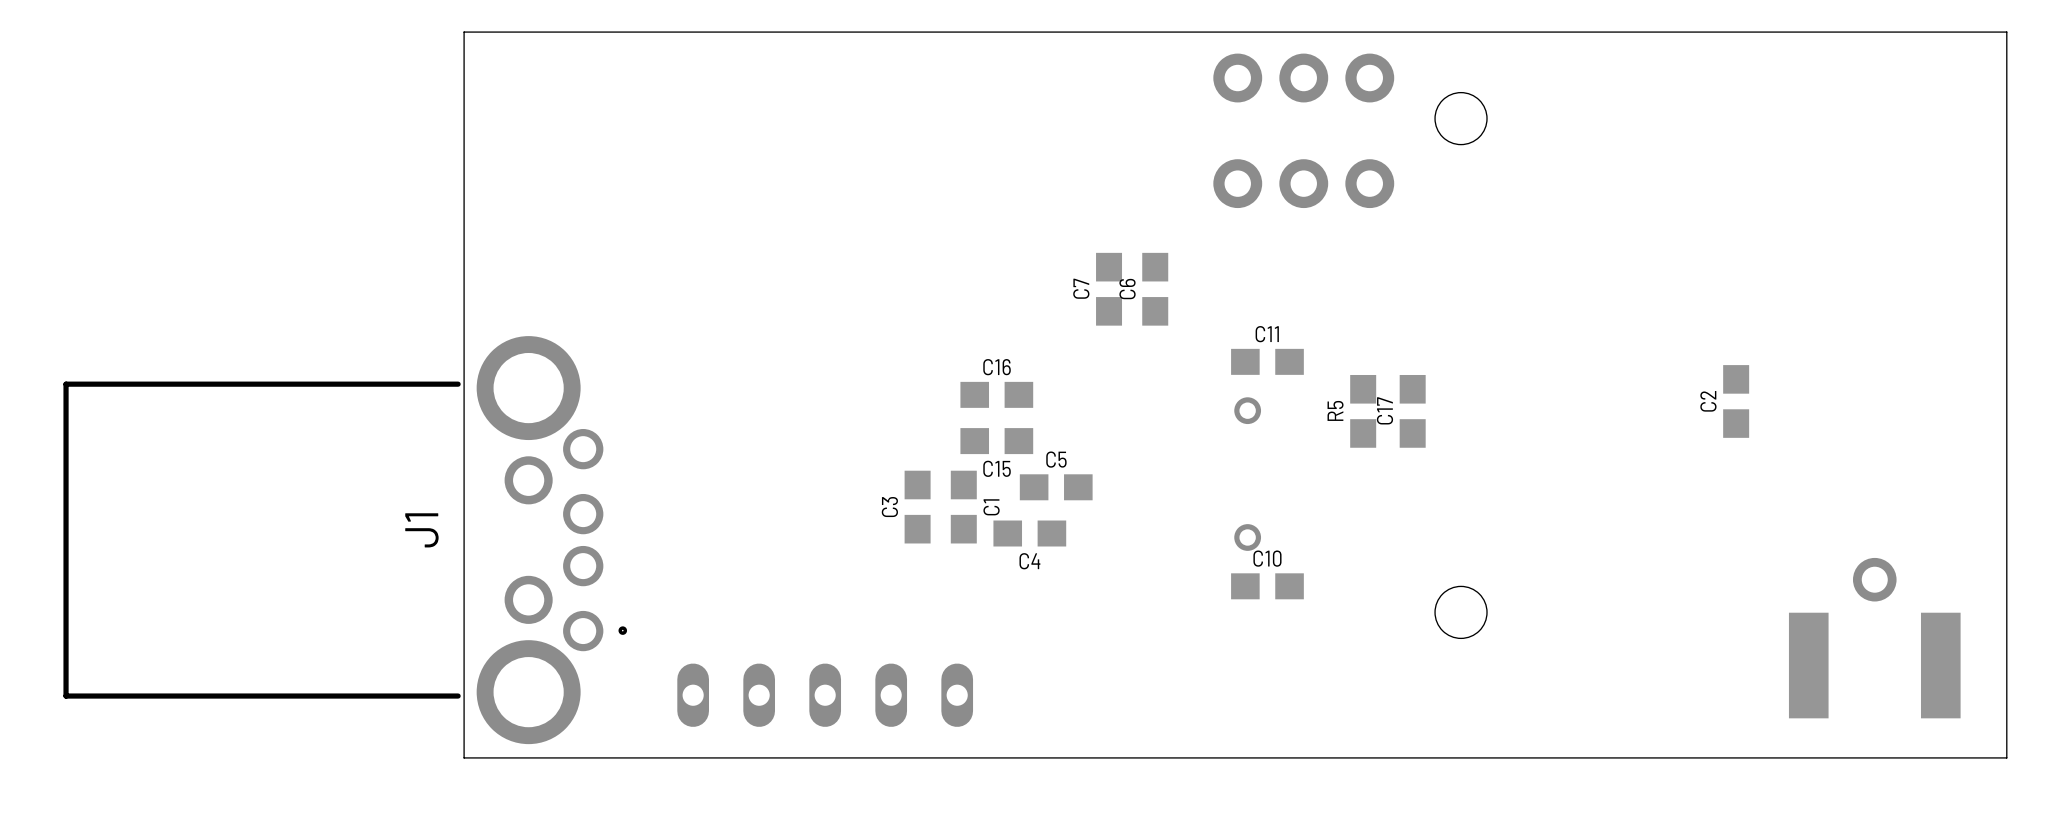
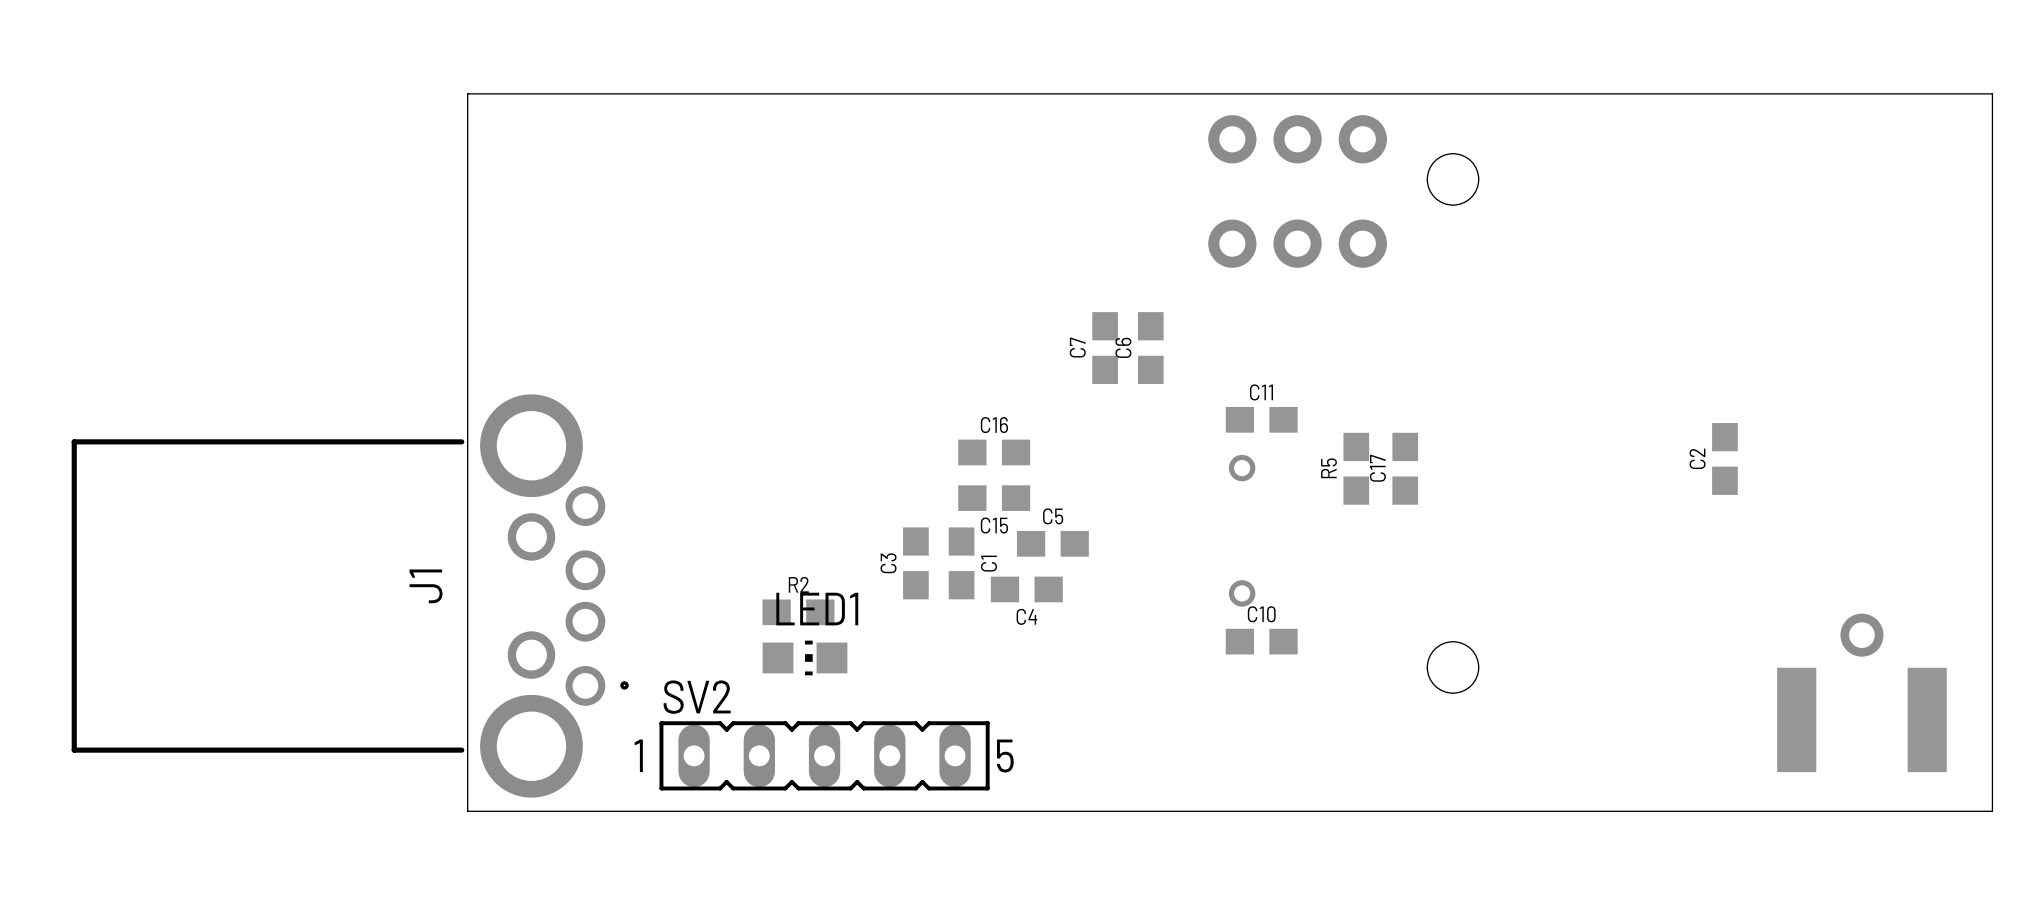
R2: none -> (798, 612)
LED1: none -> (804, 657)
SV2 side: top (825, 695) -> bottom (824, 755)

